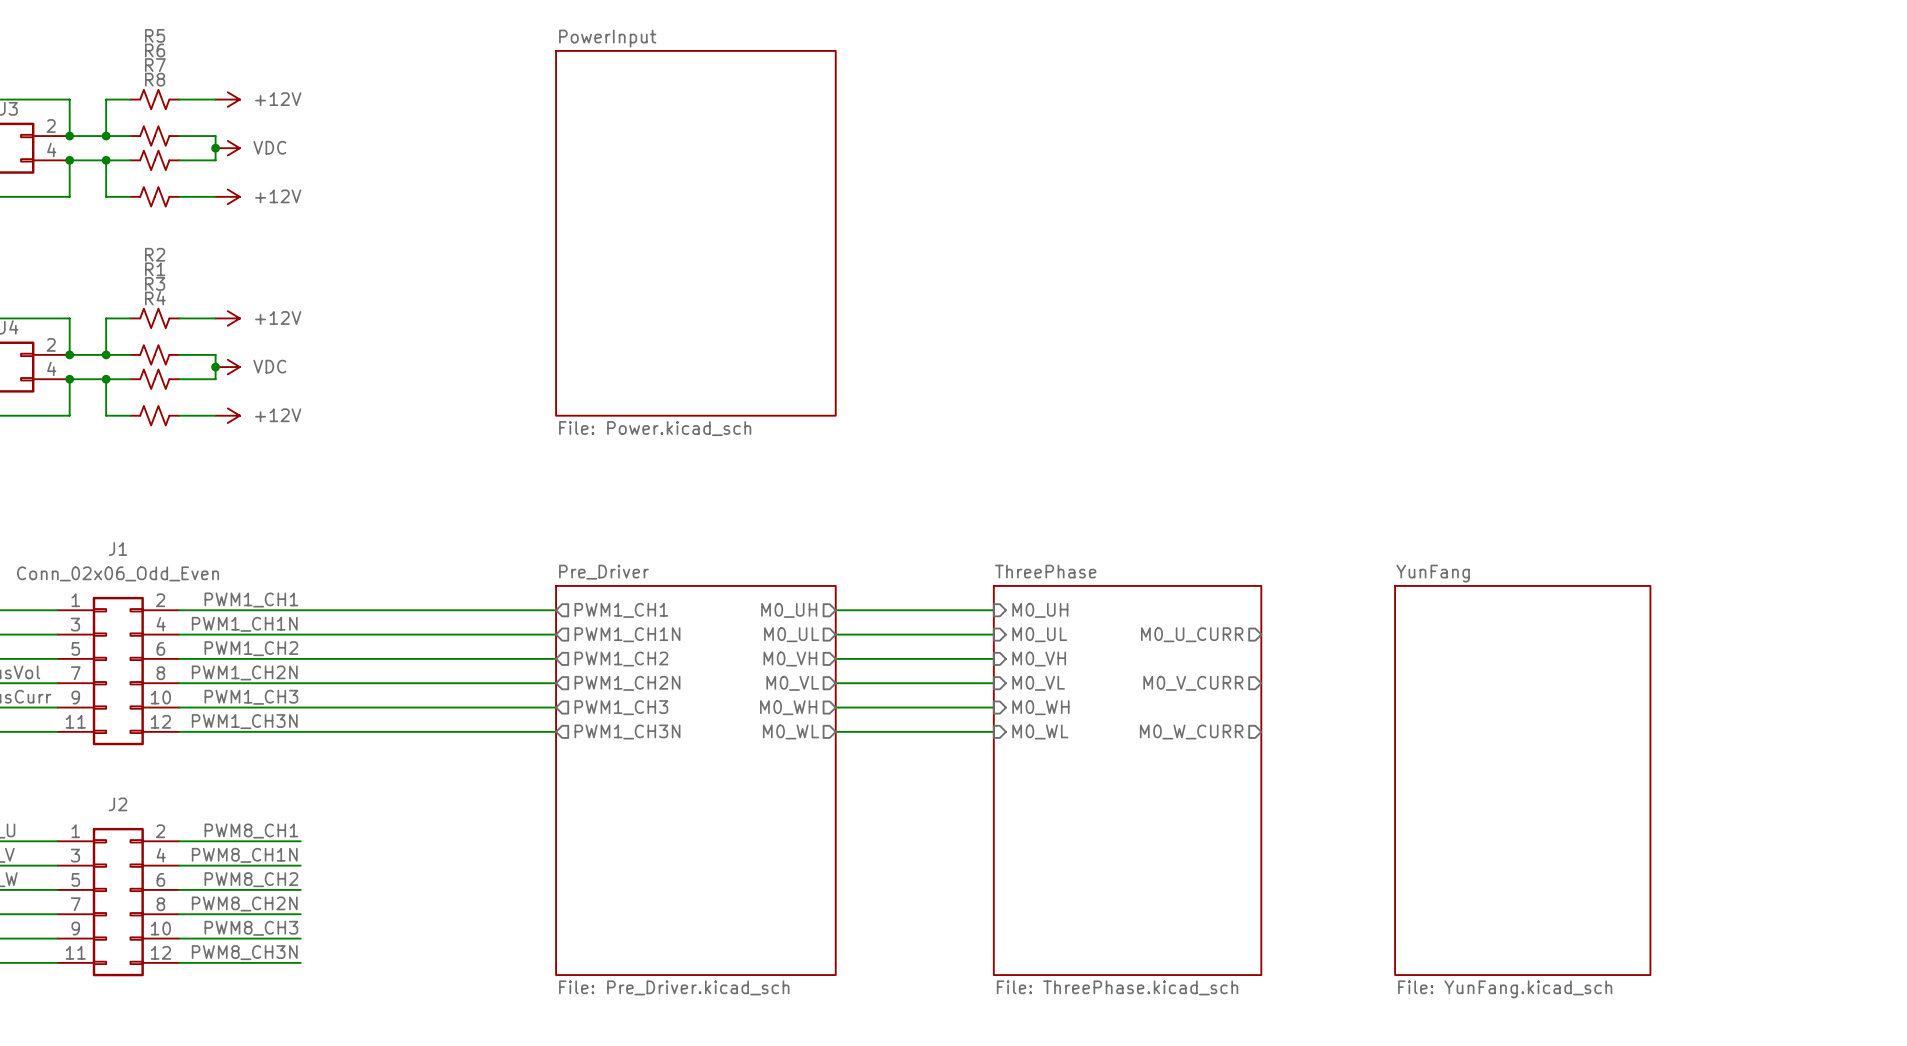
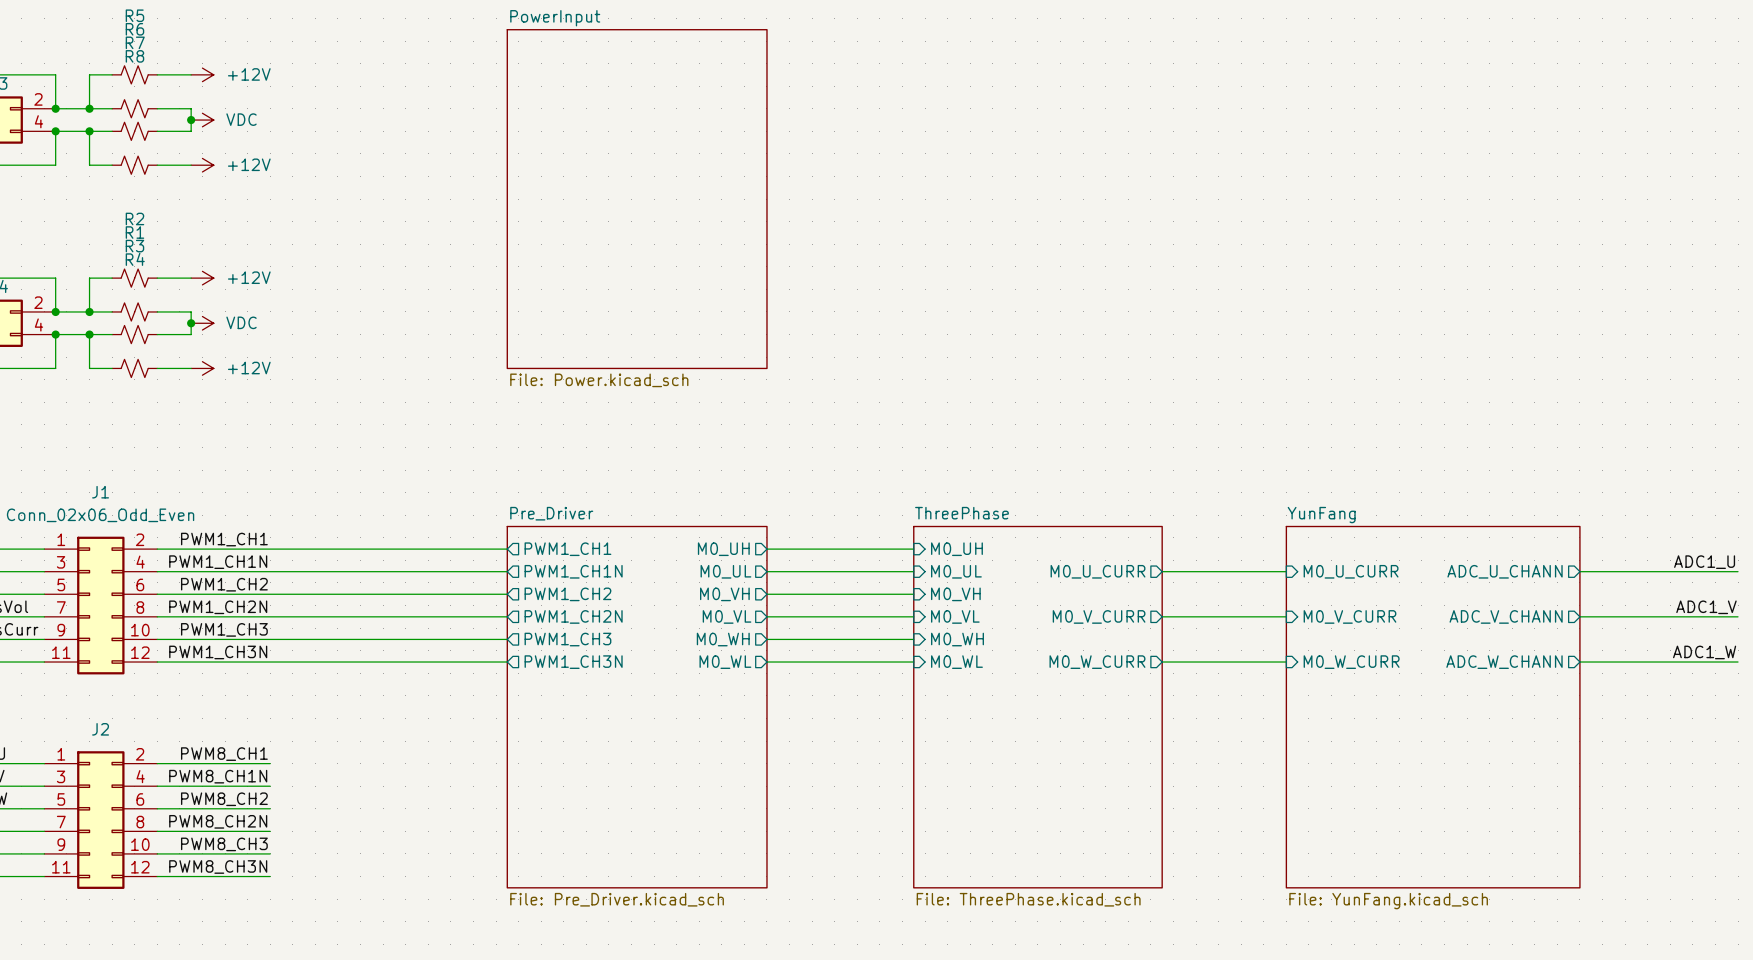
label: none -> ADC1_U (1704, 562)
wire: none -> (1162, 571) (1286, 571)
sheet pin: none -> M0_U_CURR (1351, 571)
sheet pin: none -> ADC_U_CHANN (1505, 571)
wire: none -> (1579, 571) (1738, 571)
label: none -> ADC1_V (1706, 607)
wire: none -> (1162, 616) (1286, 616)
sheet pin: none -> M0_V_CURR (1349, 616)
sheet pin: none -> ADC_V_CHANN (1506, 616)
wire: none -> (1579, 616) (1738, 616)
label: none -> ADC1_W (1704, 652)
wire: none -> (1162, 662) (1286, 662)
sheet pin: none -> M0_W_CURR (1351, 662)
sheet pin: none -> ADC_W_CHANN (1504, 662)
wire: none -> (1579, 662) (1738, 662)
sheet YunFang: File: YunFang.kicad_sch (1522, 780) -> none
sheet YunFang: none -> File: YunFang.kicad_sch (1433, 707)

